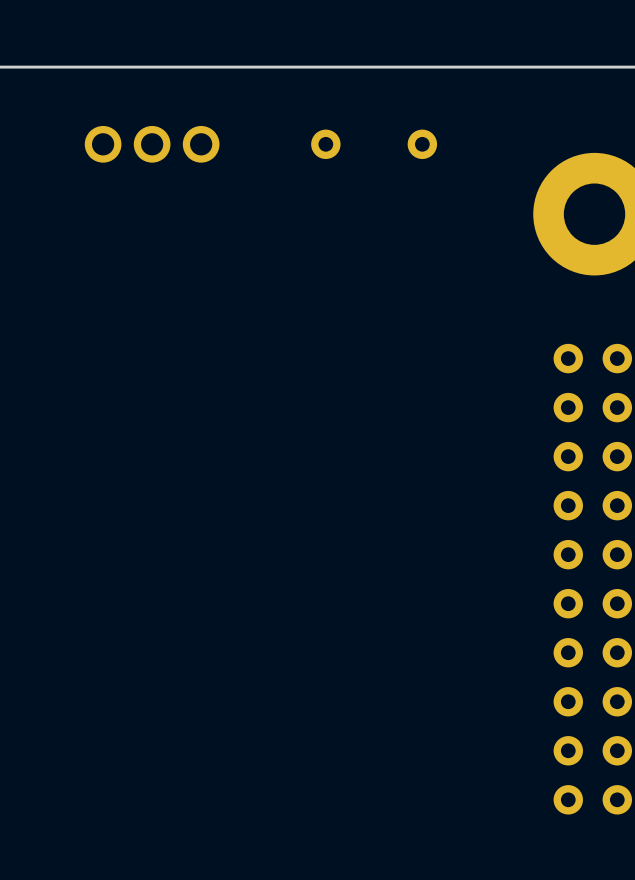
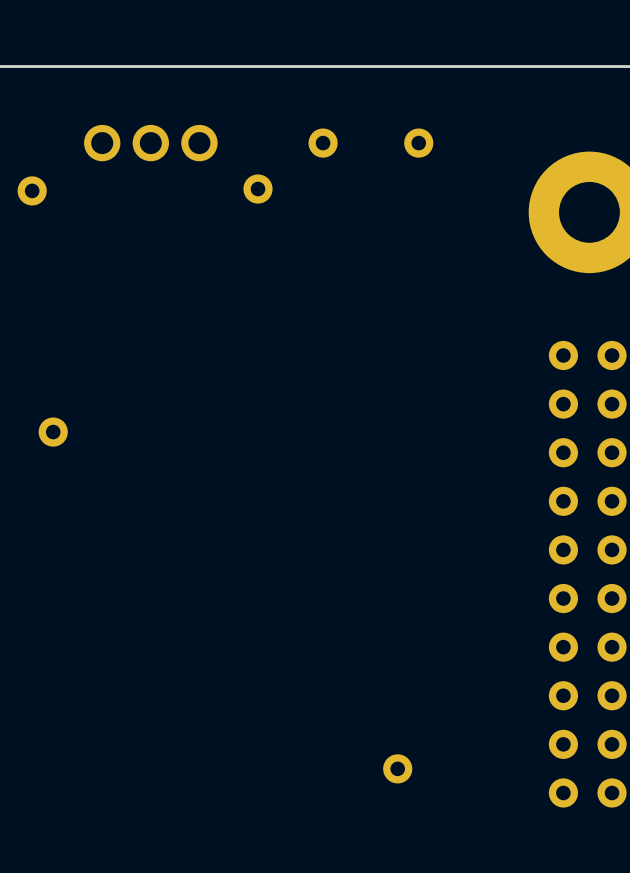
part: none -> (258, 189)
part: none -> (32, 190)
part: none -> (53, 432)
part: none -> (397, 768)

